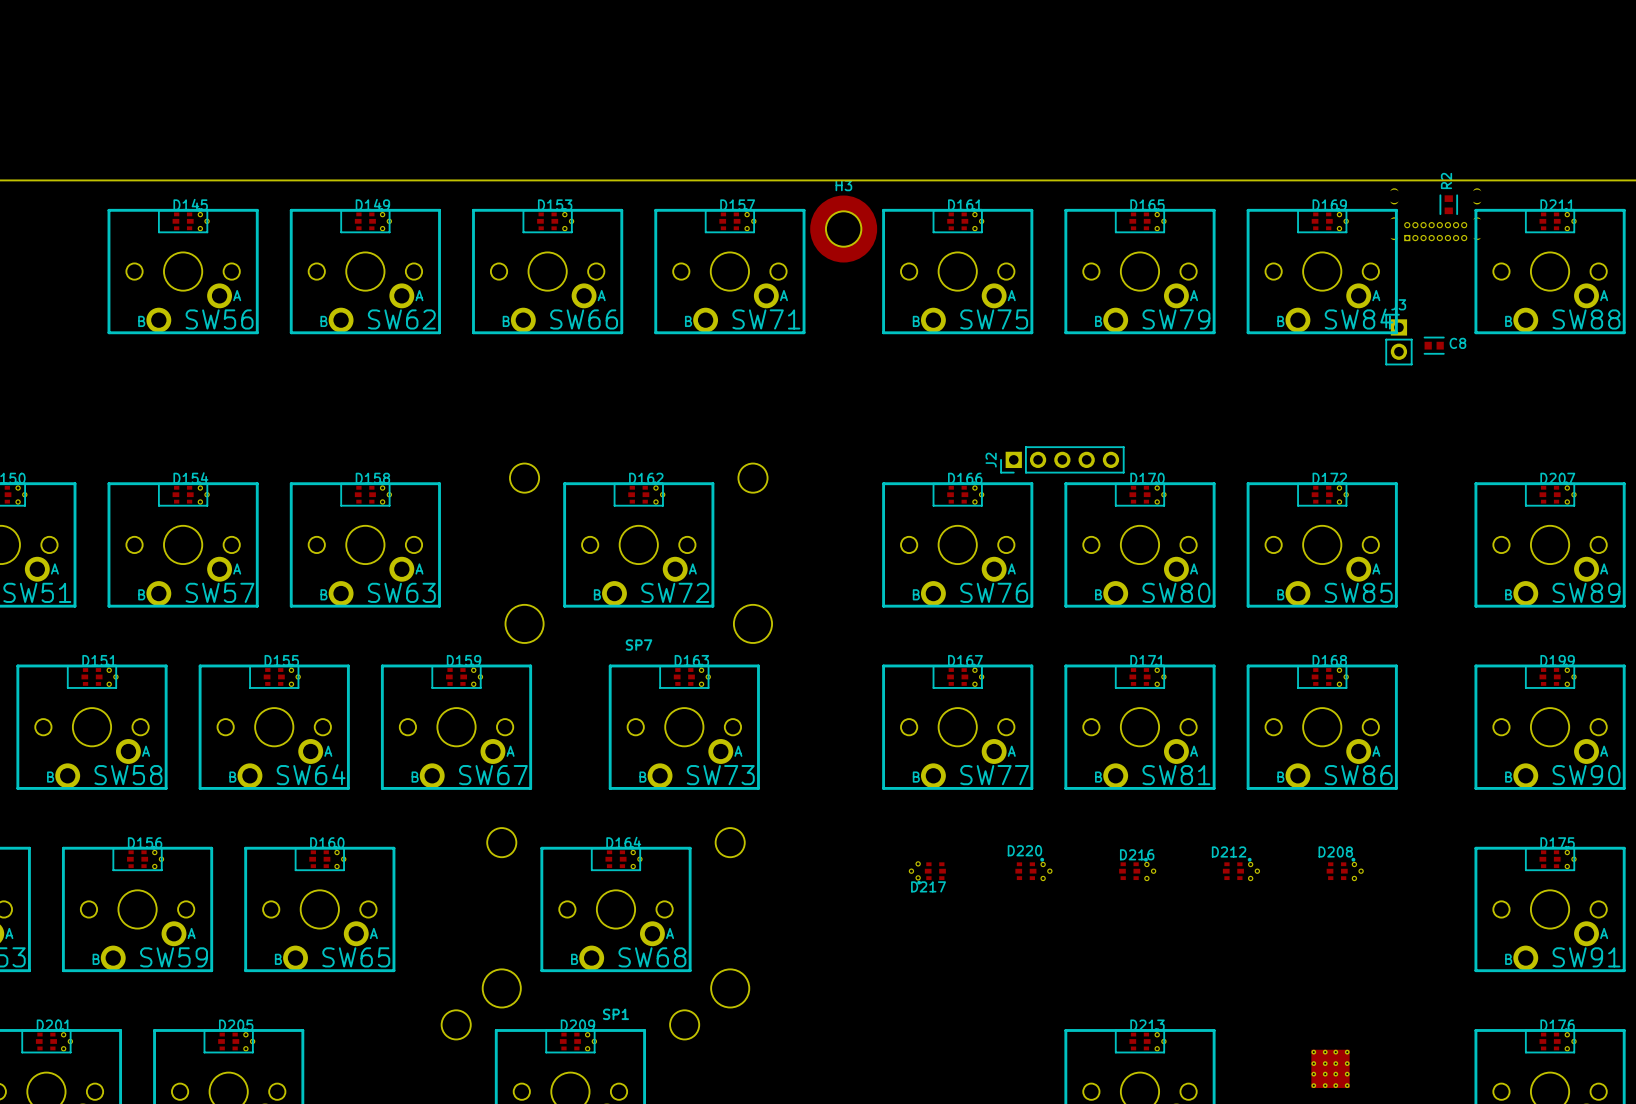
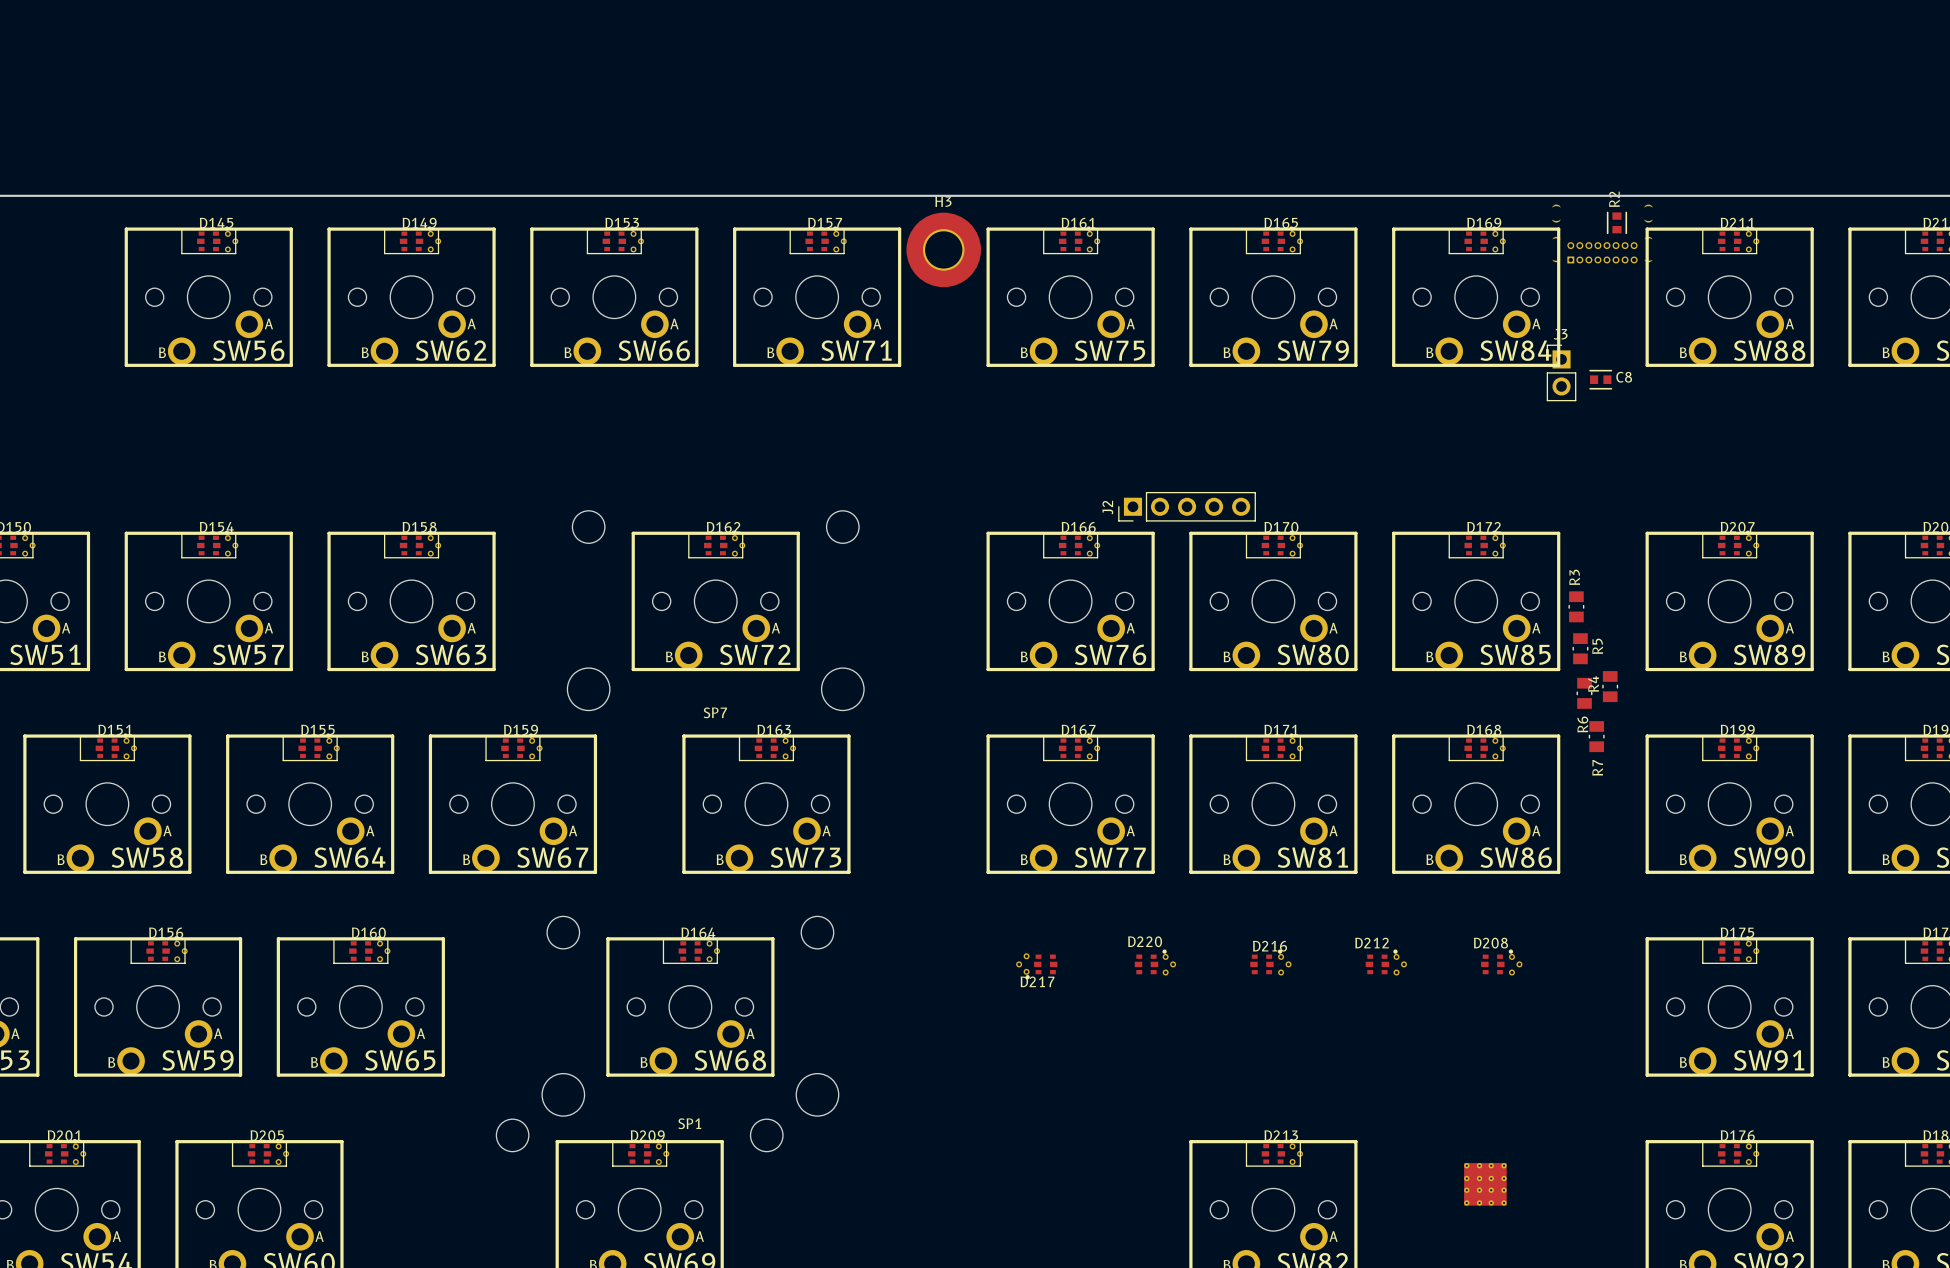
R3: none -> (1576, 606)
R5: none -> (1580, 648)
R4: none -> (1610, 686)
R6: none -> (1584, 693)
R7: none -> (1596, 736)

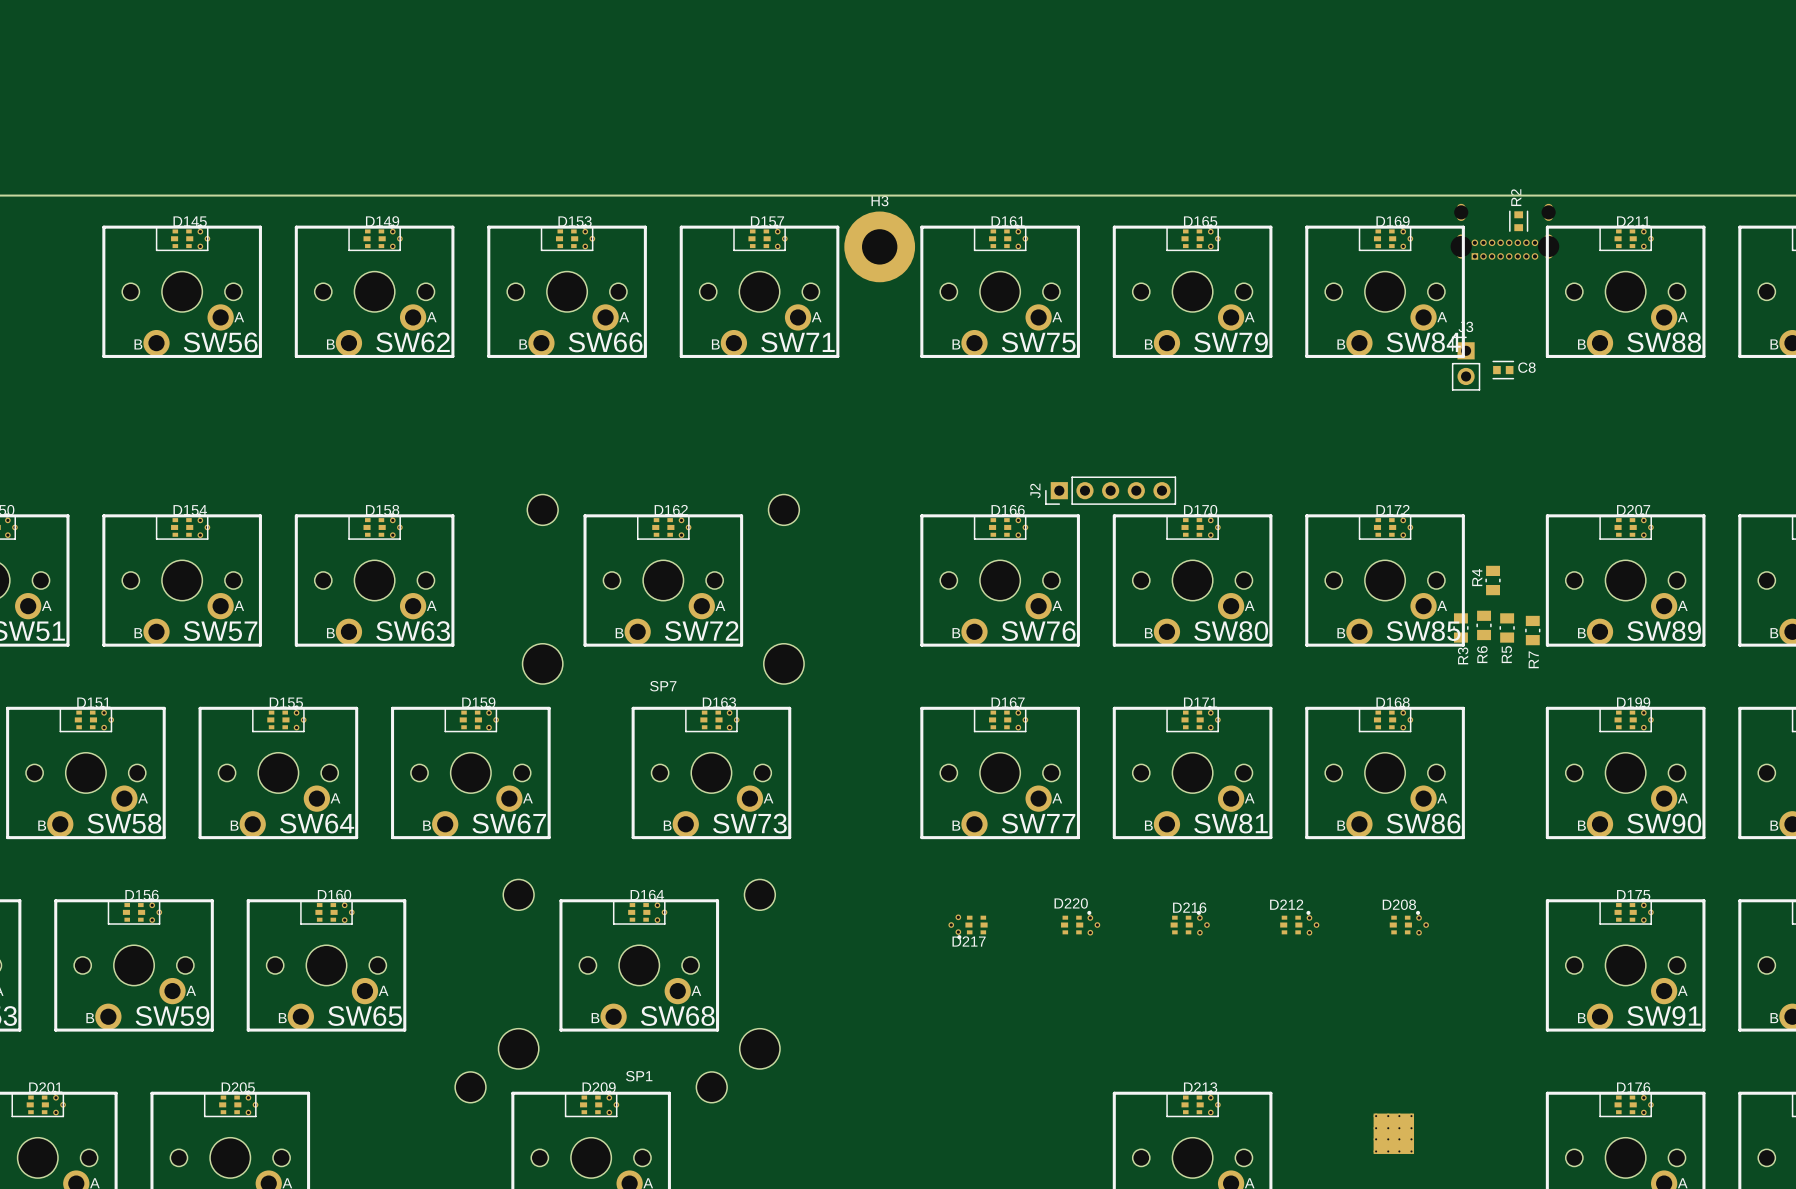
R3 name position: R3 (1574, 577) -> R3 (1463, 655)
R3 position: (1576, 606) -> (1460, 627)
R5 name: R5 (1597, 646) -> R6 (1482, 654)
R5: none -> (1507, 627)
R4 position: (1610, 686) -> (1493, 580)
R6: (1584, 693) -> none
R7 position: (1596, 736) -> (1532, 630)

